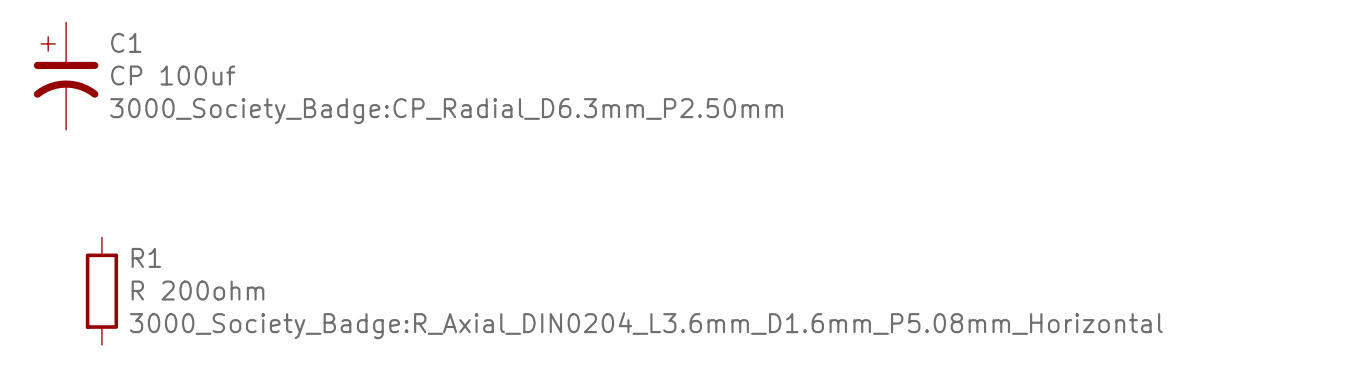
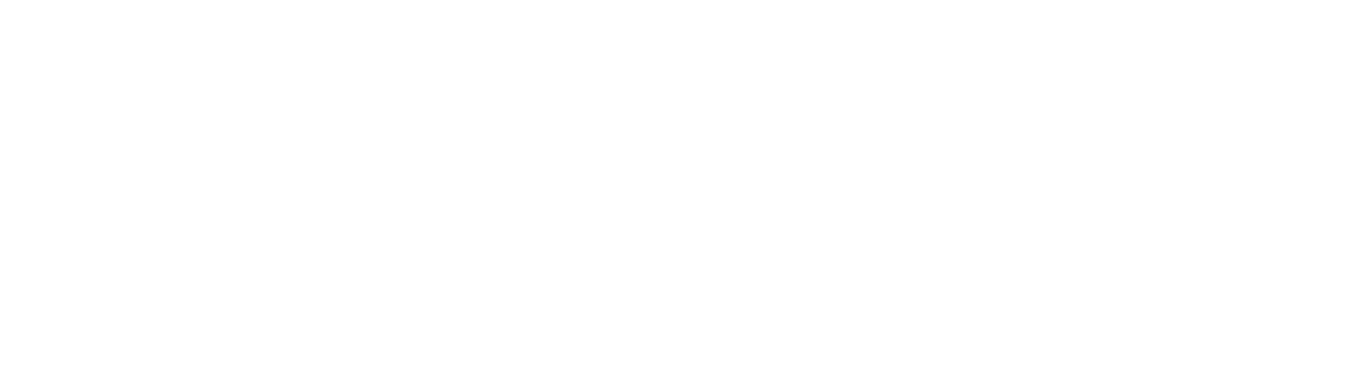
C1: CP 100uf (66, 76) -> none
R1: R 200ohm (101, 291) -> none

